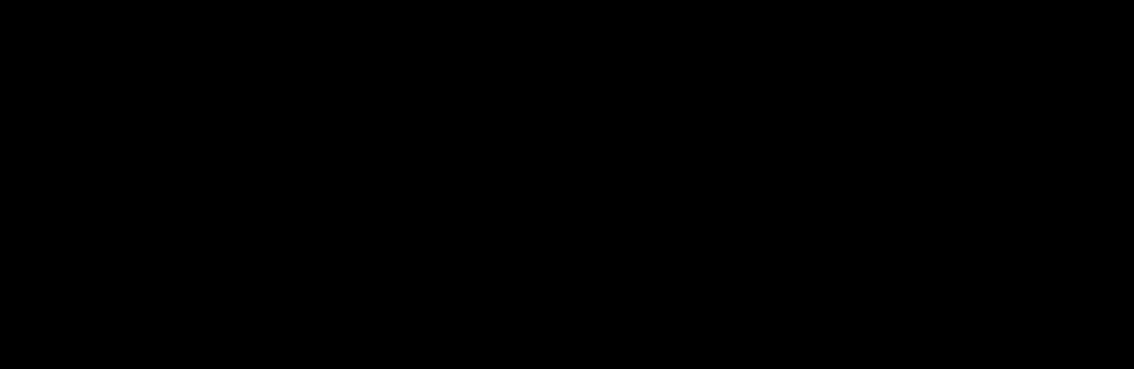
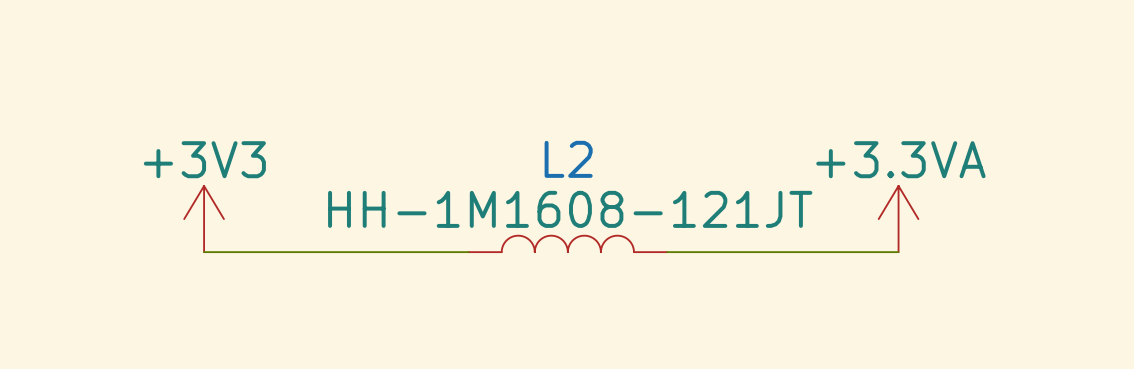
power symbol: none -> +3V3 (204, 219)
power symbol: none -> +3.3VA (898, 219)
L2: none -> HH-1M1608-121JT (567, 243)
wire: none -> (204, 252) (468, 252)
wire: none -> (667, 252) (898, 252)

